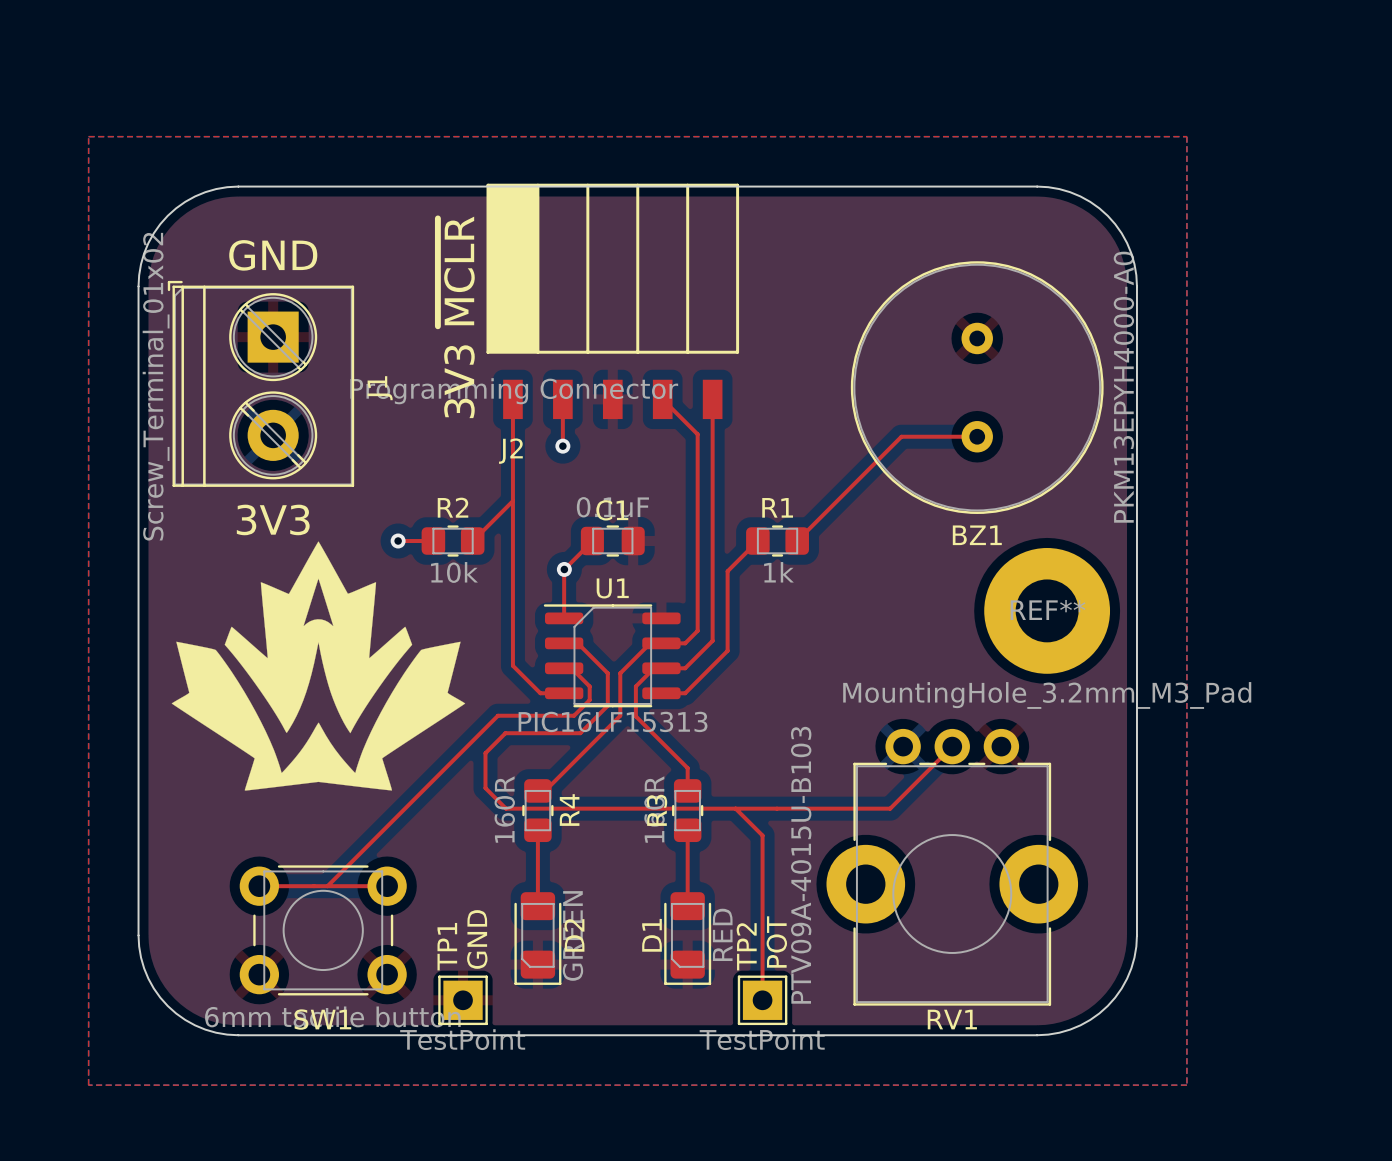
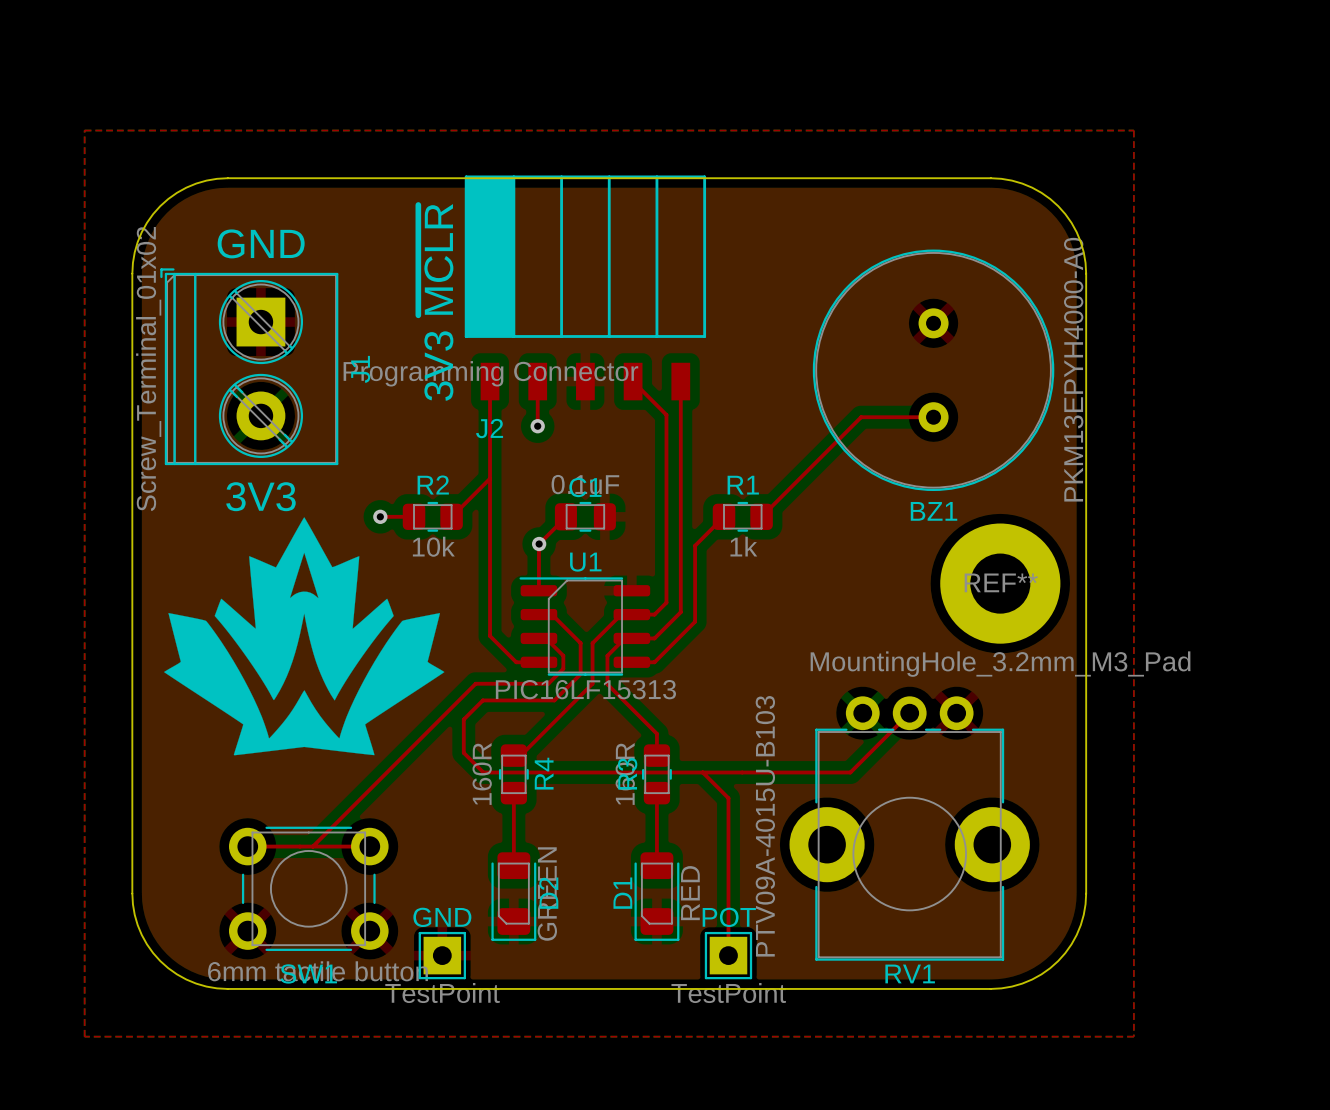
text: GND (477, 939) -> none
text: POT (776, 942) -> none
TP1 name: TP1 (447, 946) -> GND (442, 917)
TP2 name: TP2 (746, 946) -> POT (729, 917)

